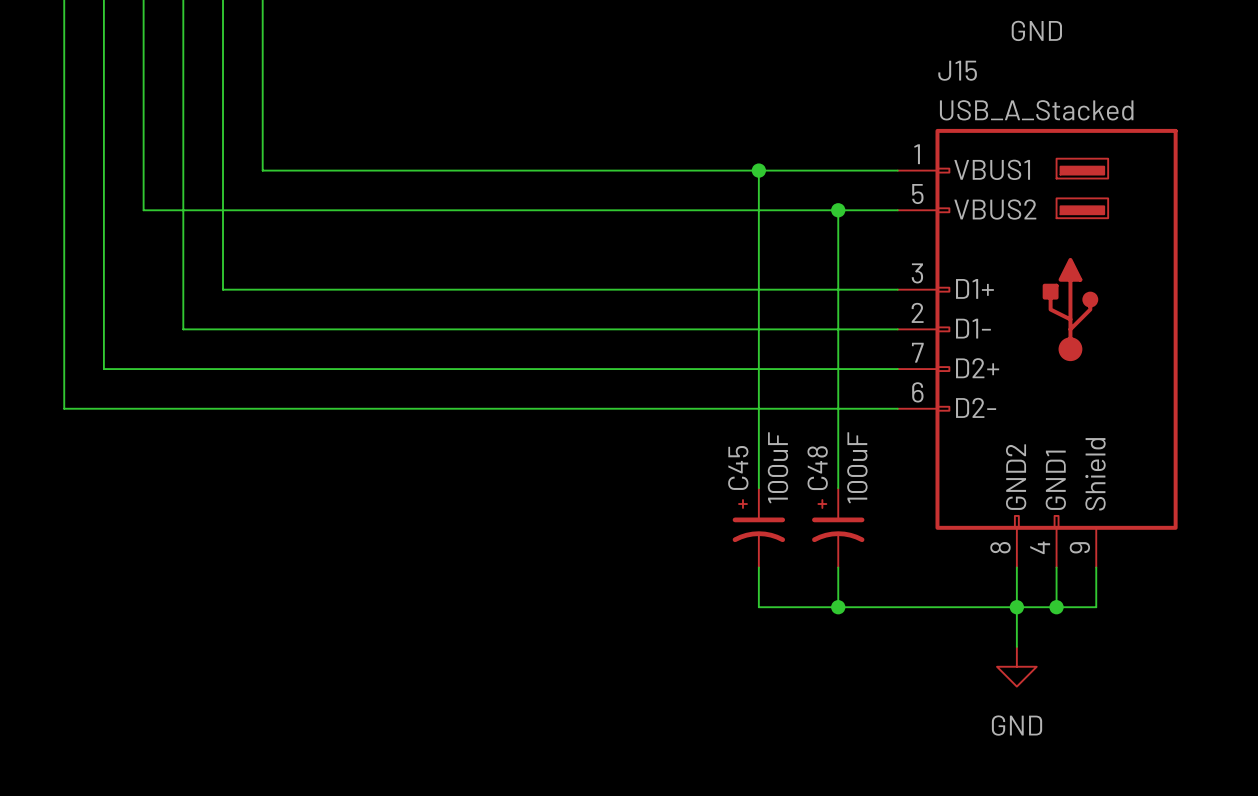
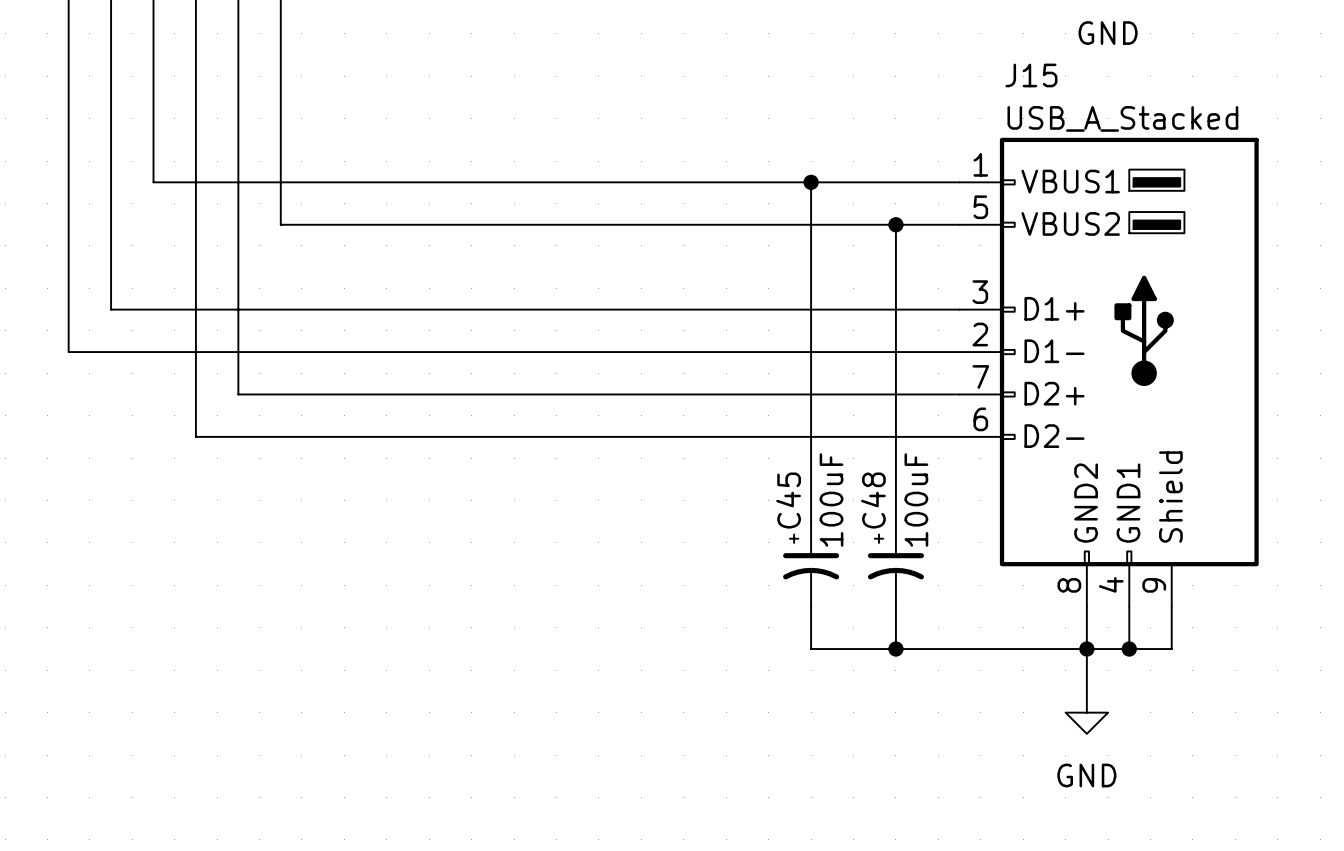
wire: (143, 170) (143, 210) (262, 210) -> (153, 182) (280, 182) (280, 224)
wire: (103, 289) (103, 369) (223, 369) -> (111, 309) (238, 309) (238, 394)
wire: (64, 329) (64, 408) (183, 408) -> (68, 352) (195, 352) (195, 436)

